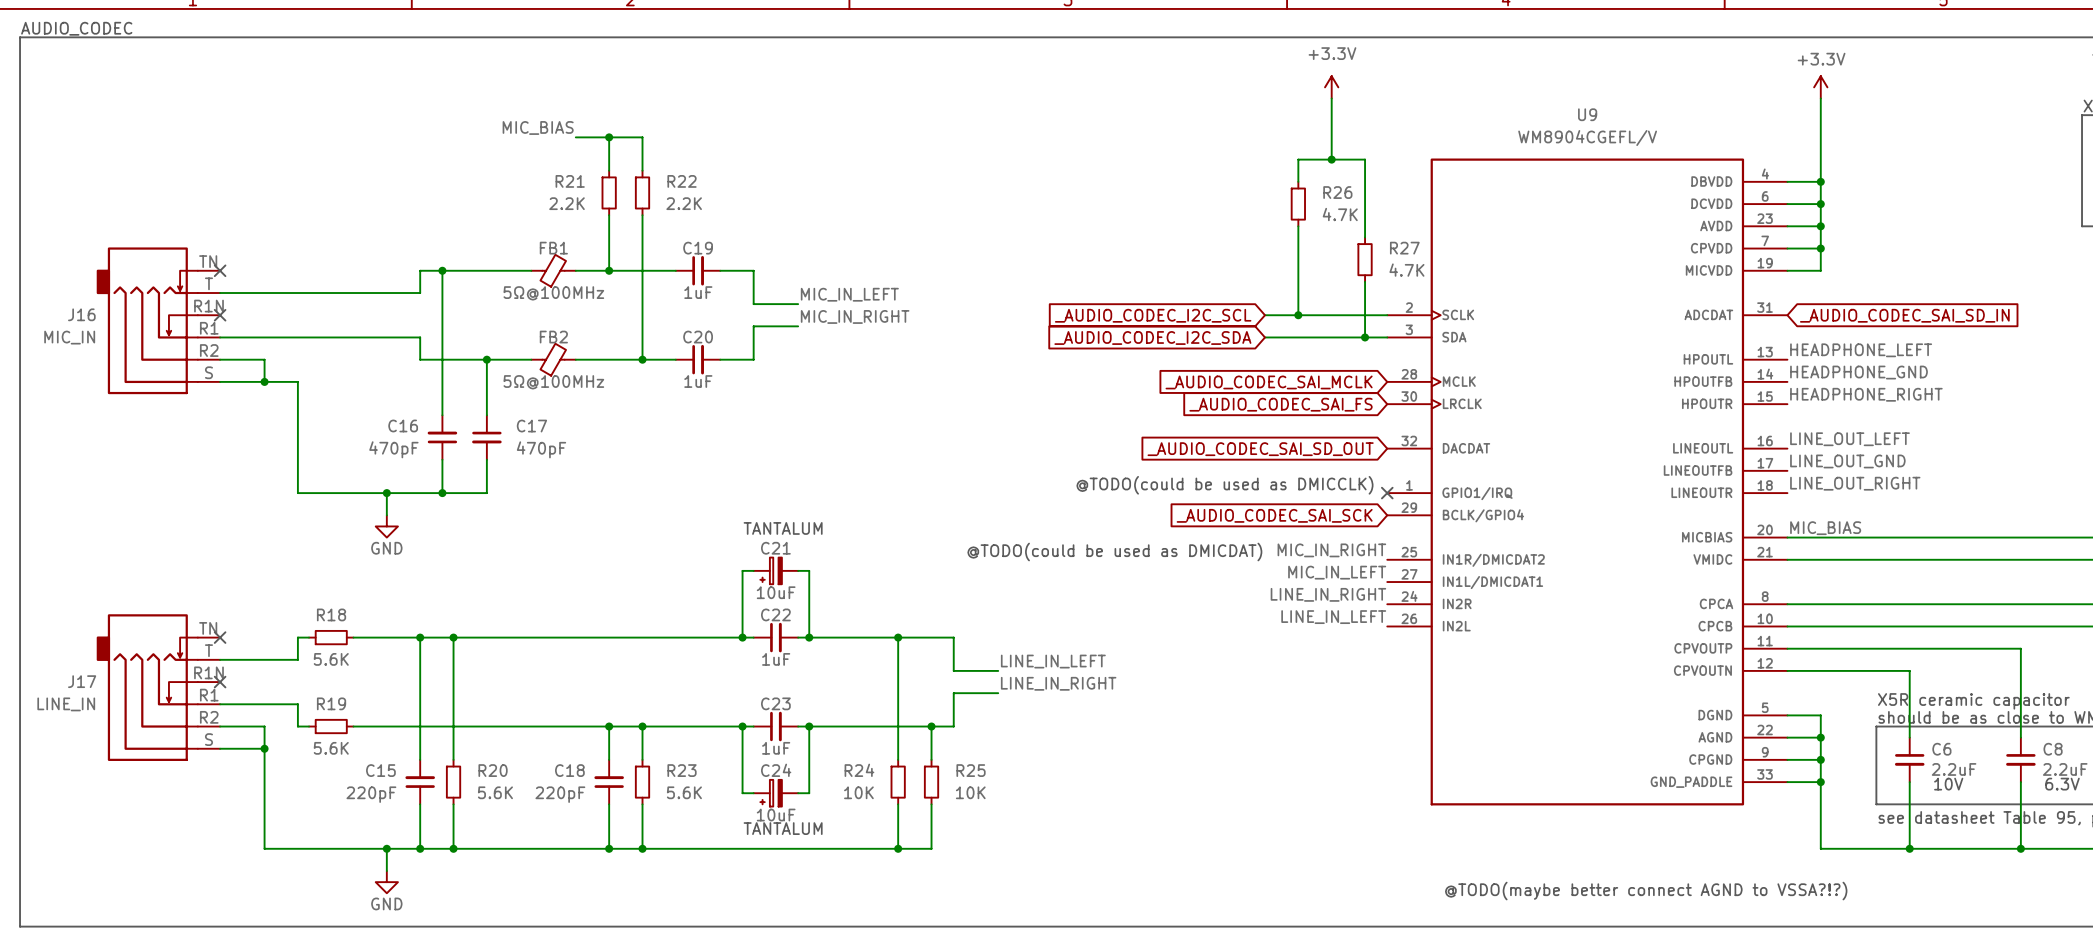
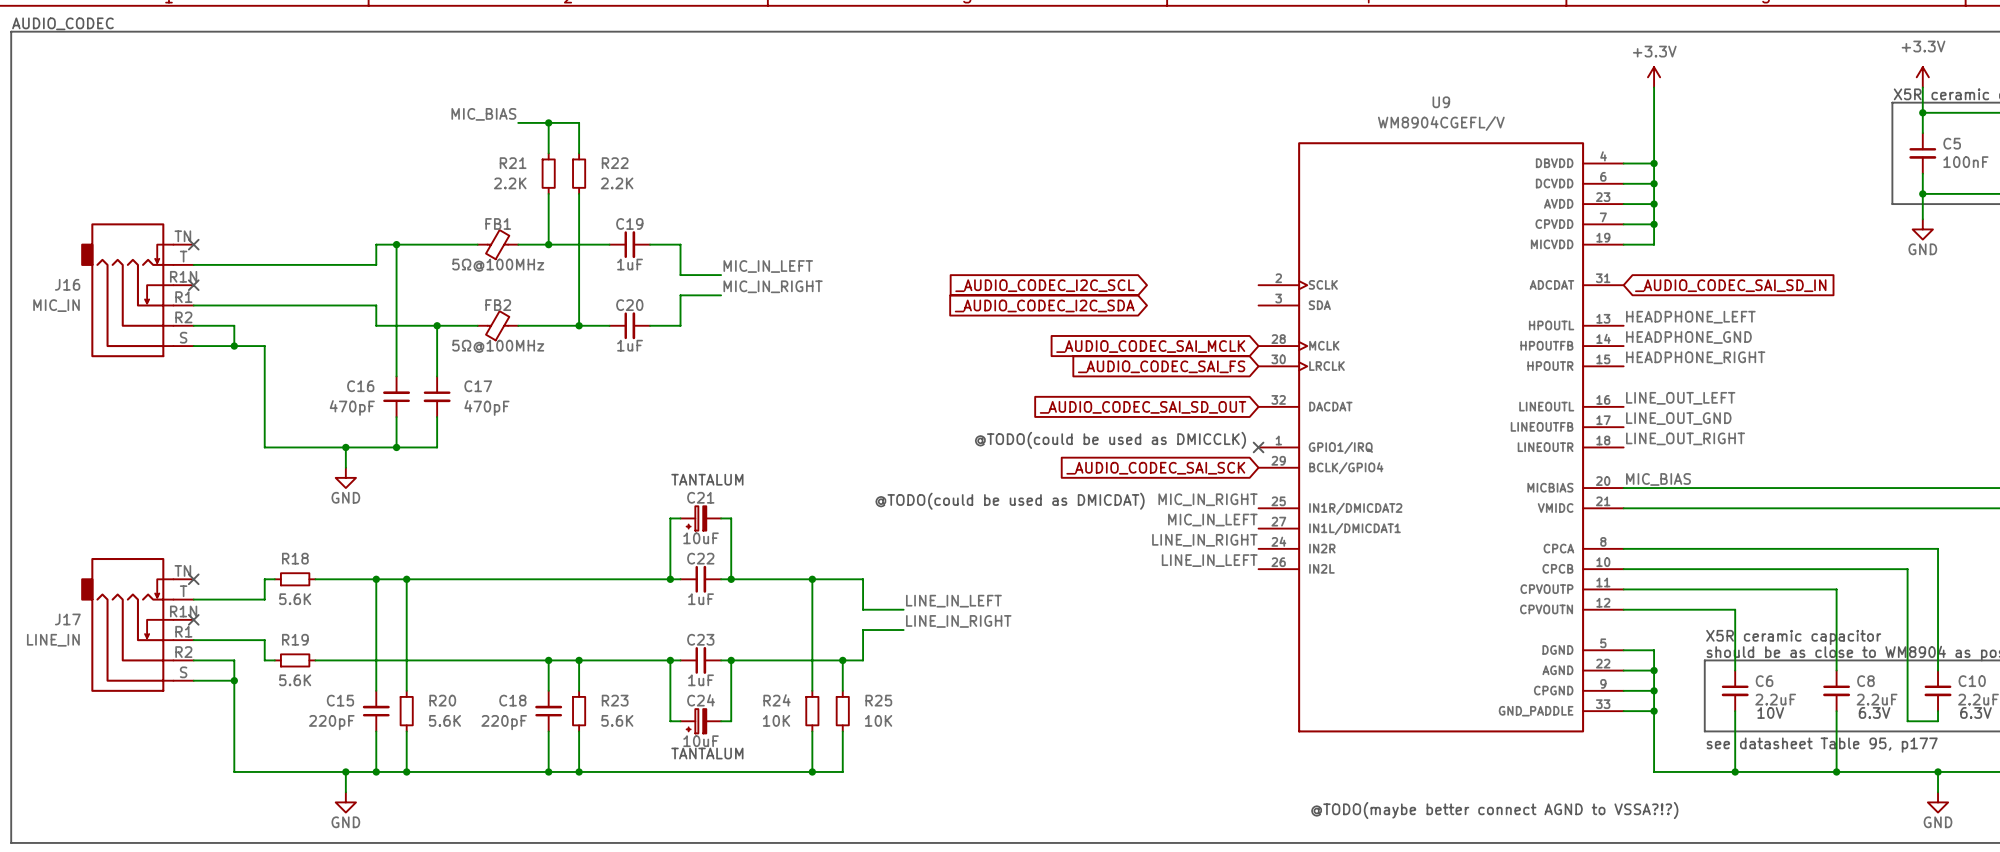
power symbol: +3.3V (1331, 87) -> none
wire: (1331, 98) (1331, 159) -> none
junction: (1331, 159) -> none
wire: (1298, 181) (1298, 159) (1365, 159) (1365, 237) -> none
R26: 4.7K (1298, 204) -> none
wire: (1298, 226) (1298, 315) -> none
R27: 4.7K (1365, 259) -> none
wire: (1365, 281) (1365, 337) -> none
wire: (1264, 315) (1387, 315) -> none
junction: (1298, 315) -> none
wire: (1264, 337) (1387, 337) -> none
junction: (1365, 337) -> none

